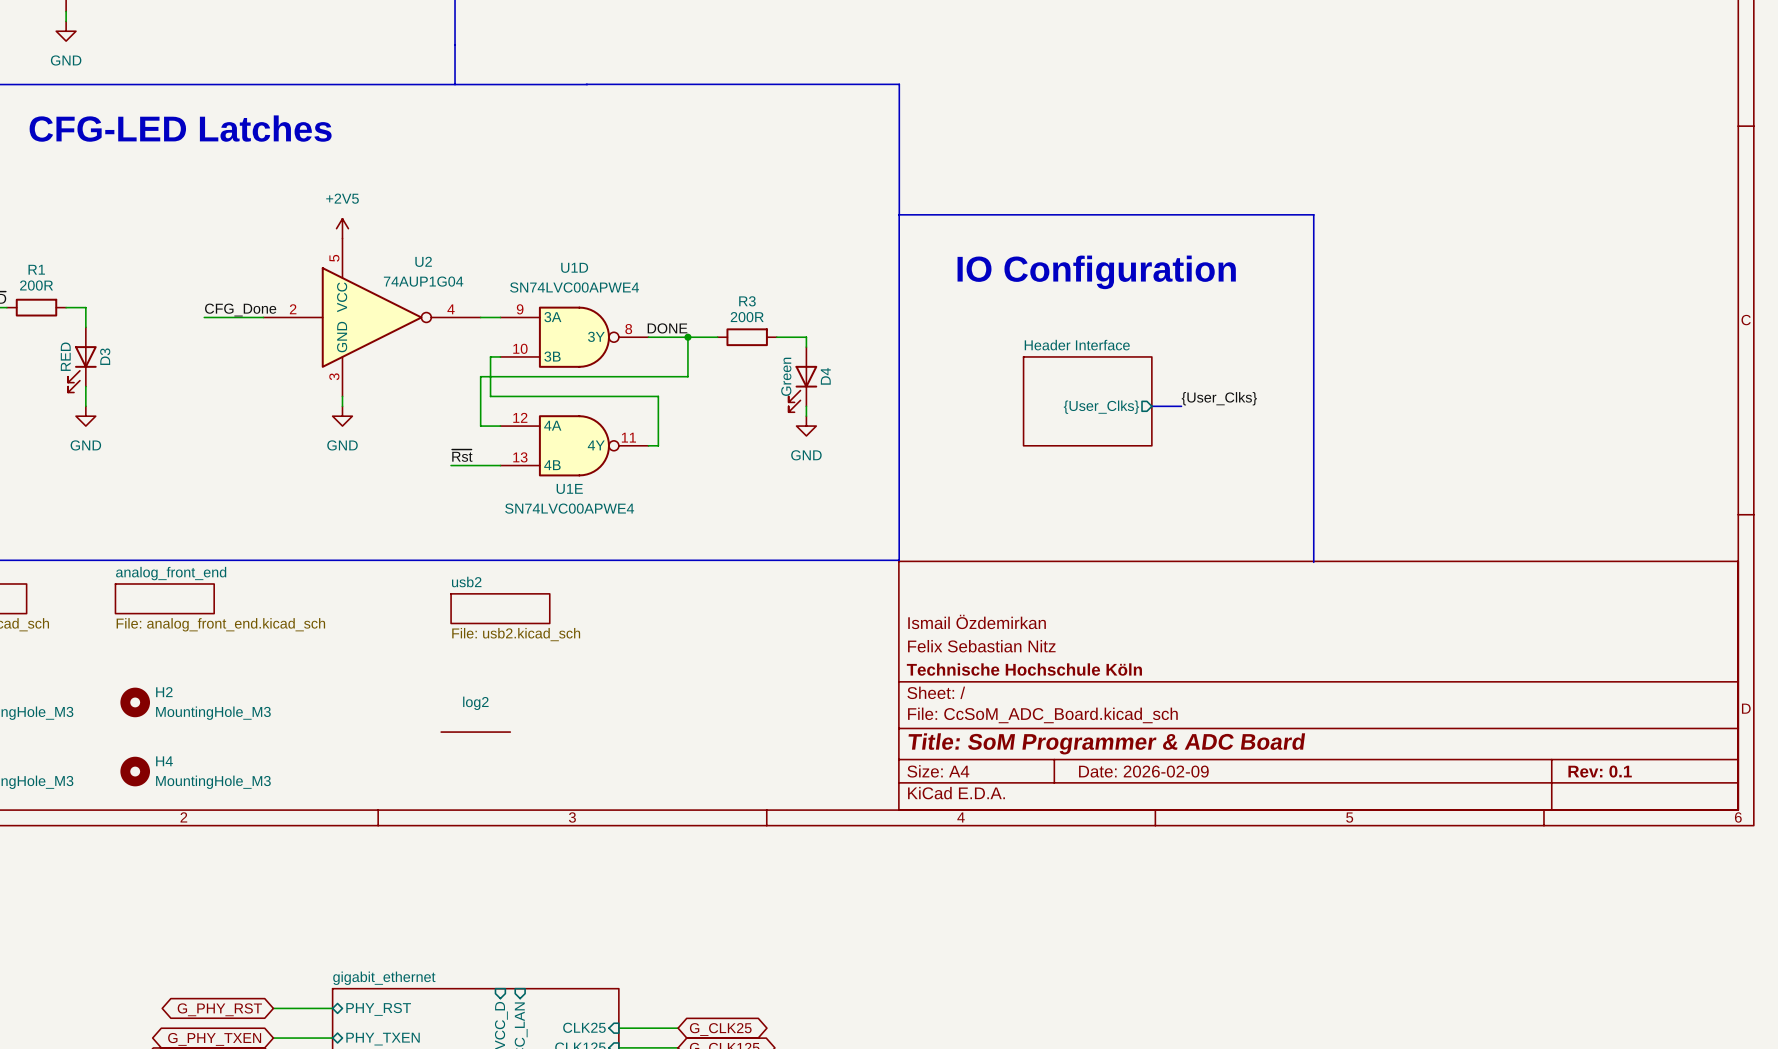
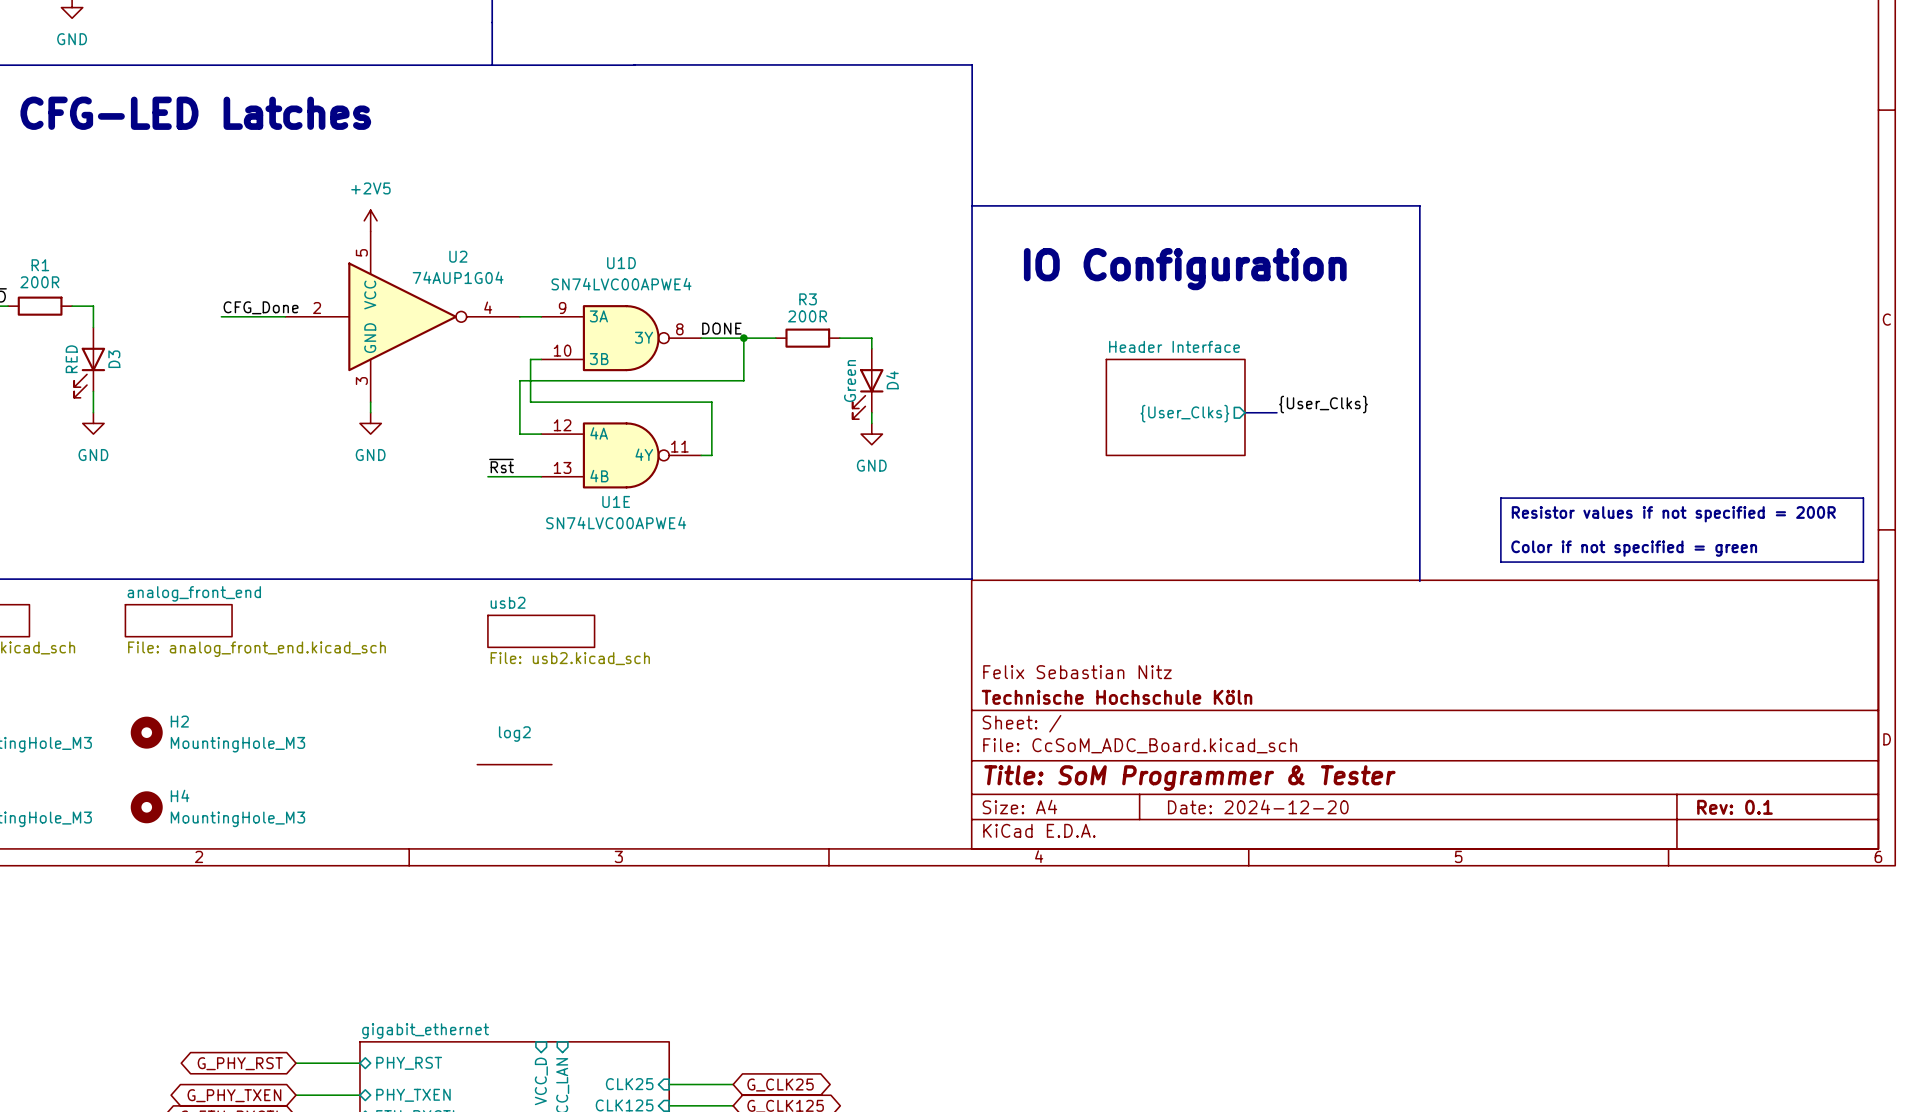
line: none -> (1500, 498) (1863, 498) (1863, 562) (1500, 562) (1500, 498)
text: none -> Resistor values if not specified = 200R (1673, 514)
text: none -> Color if not specified = green (1634, 548)
title block: Ismail Özdemirkan (977, 621) -> none
title block: Title: SoM Programmer & ADC Board (1106, 743) -> Title: SoM Programmer & Tester (1189, 778)
title block: Date: 2026-02-09 (1143, 771) -> Date: 2024-12-20 (1258, 807)

